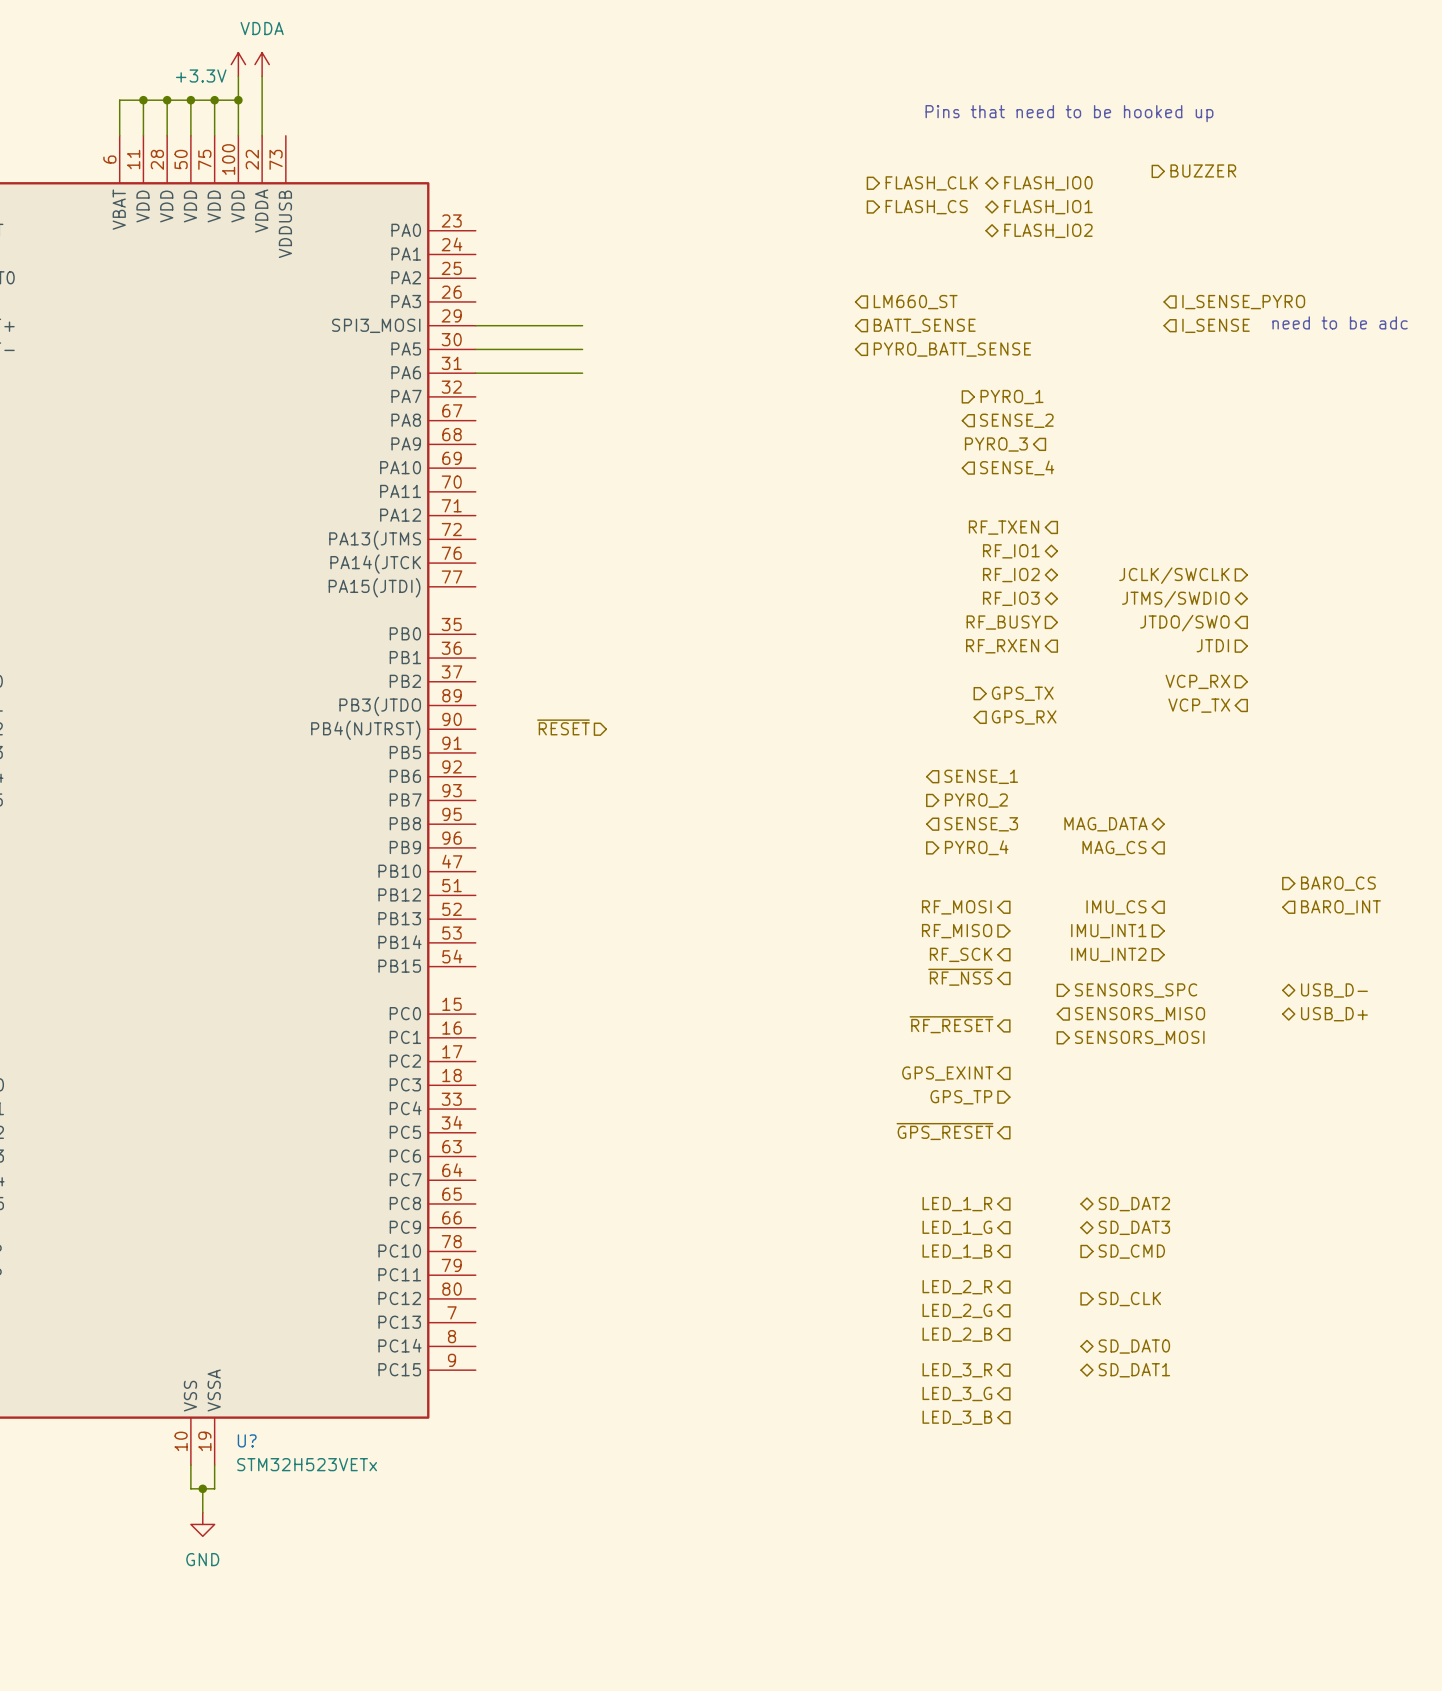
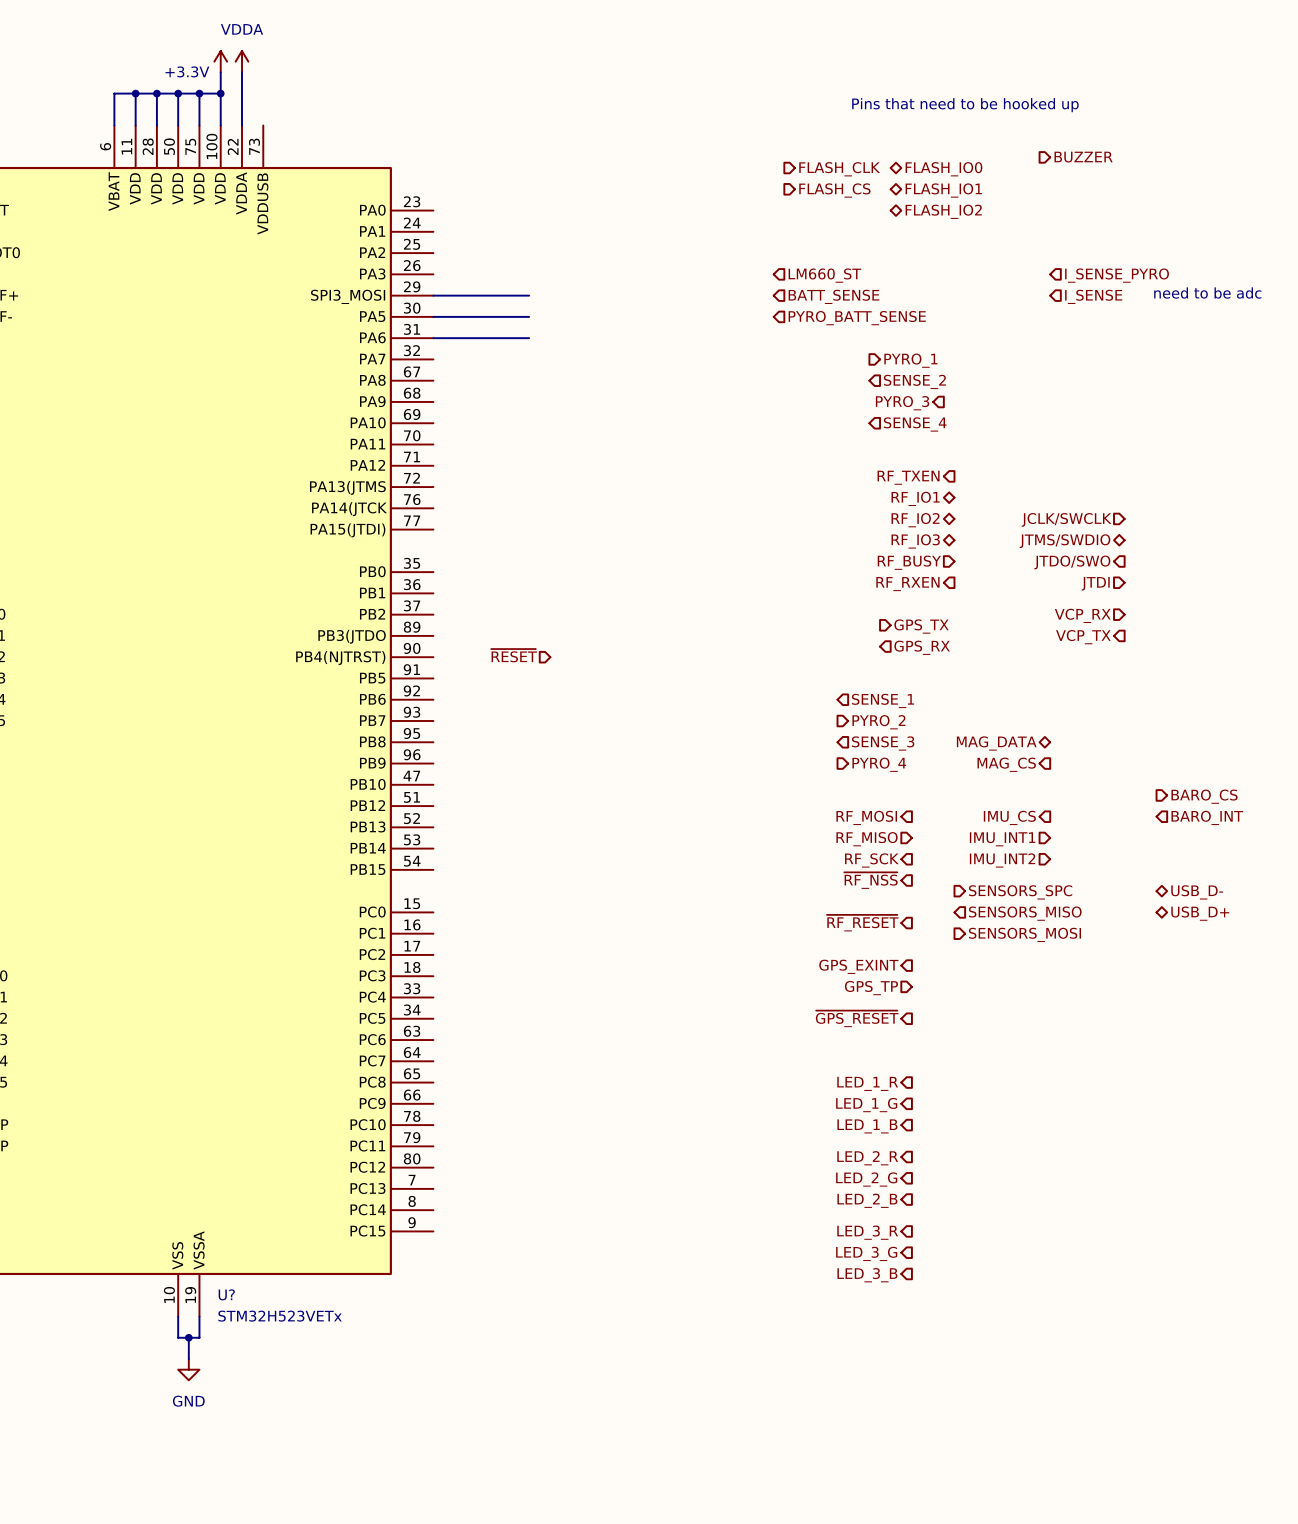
hierarchical label: SD_DAT2 (1134, 1204) -> none
hierarchical label: SD_DAT3 (1134, 1227) -> none
hierarchical label: SD_CMD (1131, 1251) -> none
hierarchical label: SD_CLK (1129, 1299) -> none
hierarchical label: SD_DAT0 (1134, 1346) -> none
hierarchical label: SD_DAT1 (1134, 1370) -> none

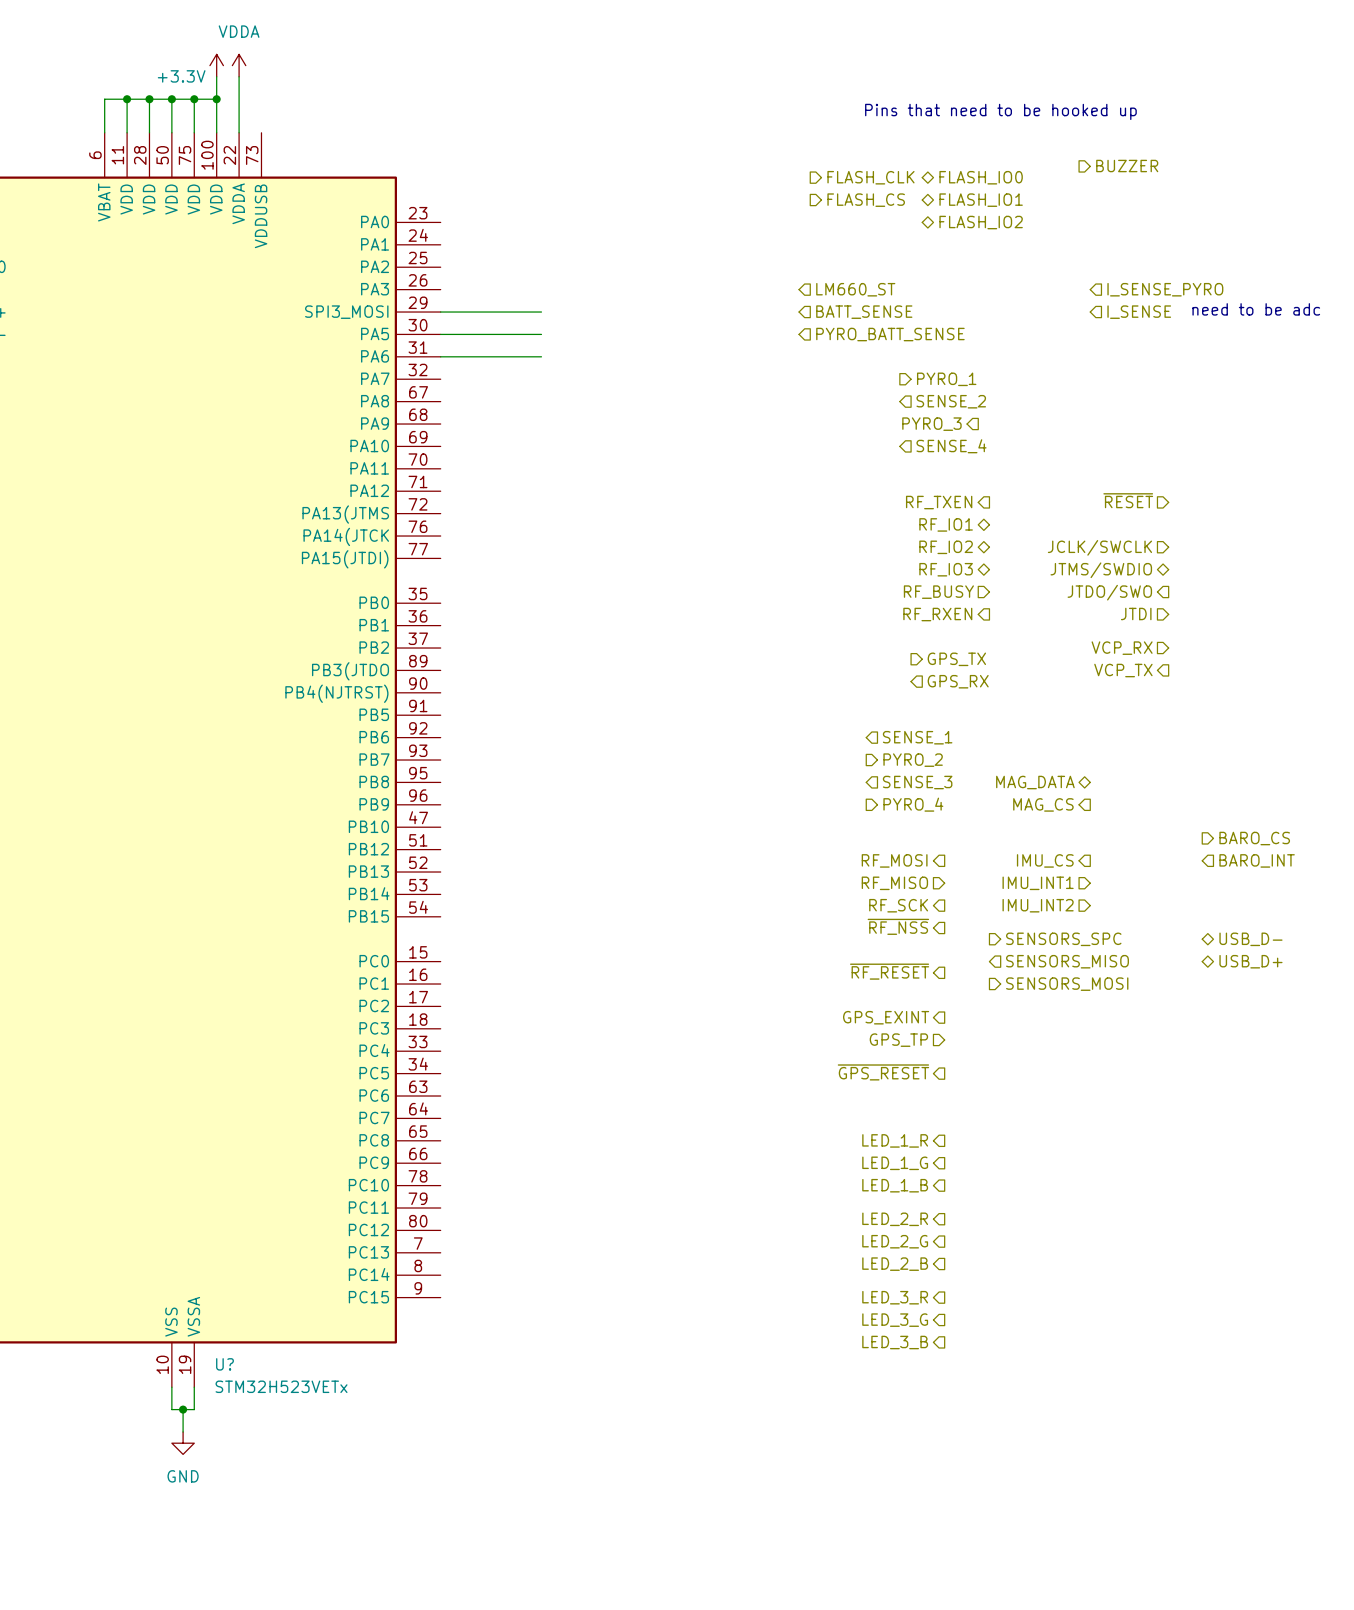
hierarchical label: none -> ~{RESET} (1128, 500)
hierarchical label: ~{RESET} (514, 655) -> none

